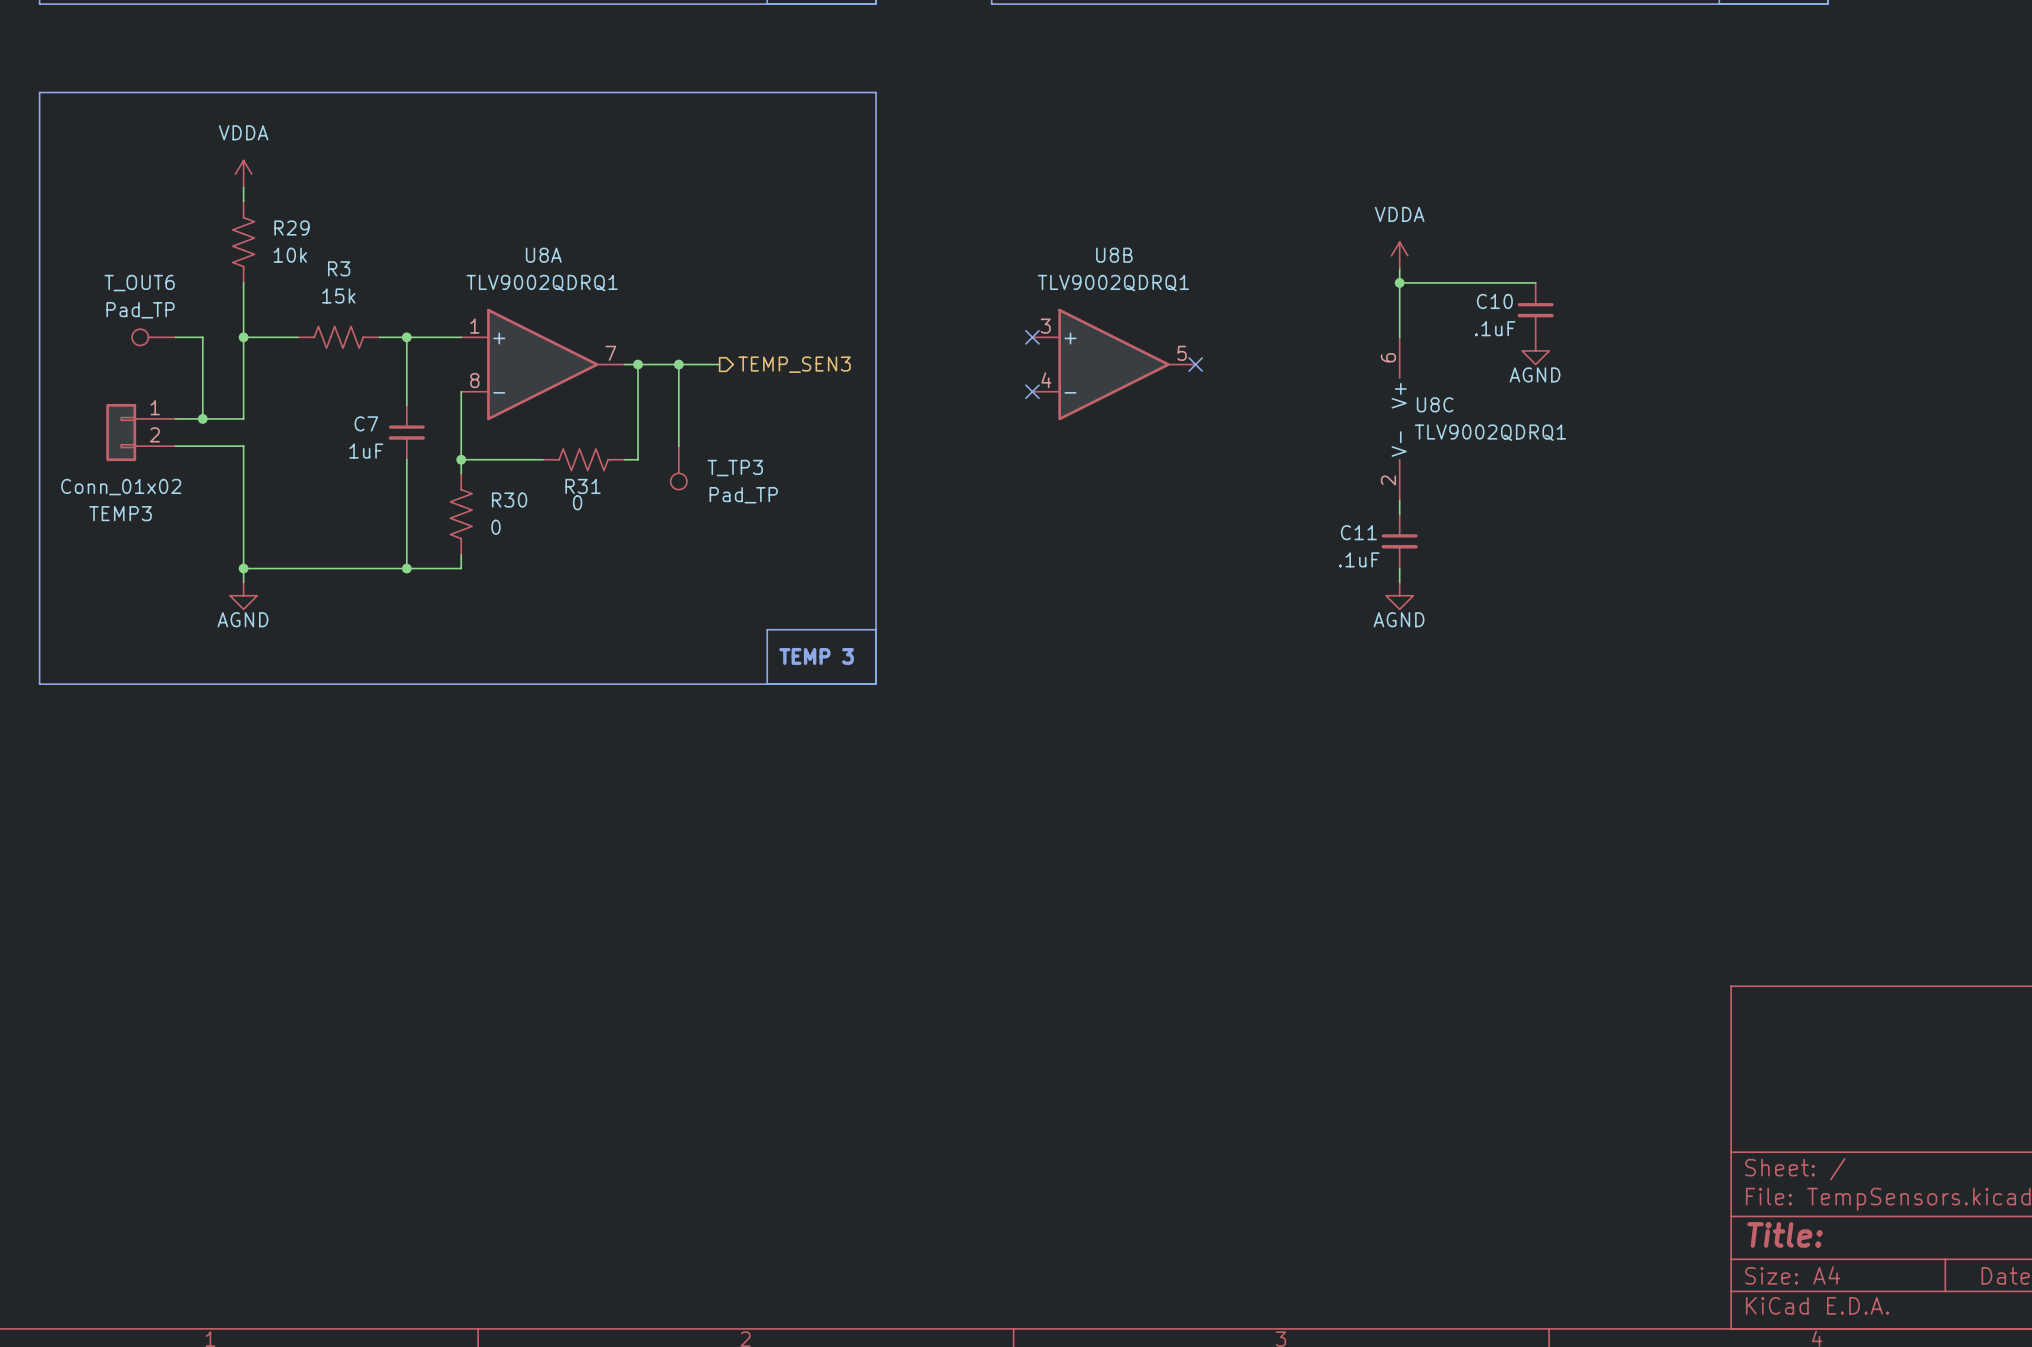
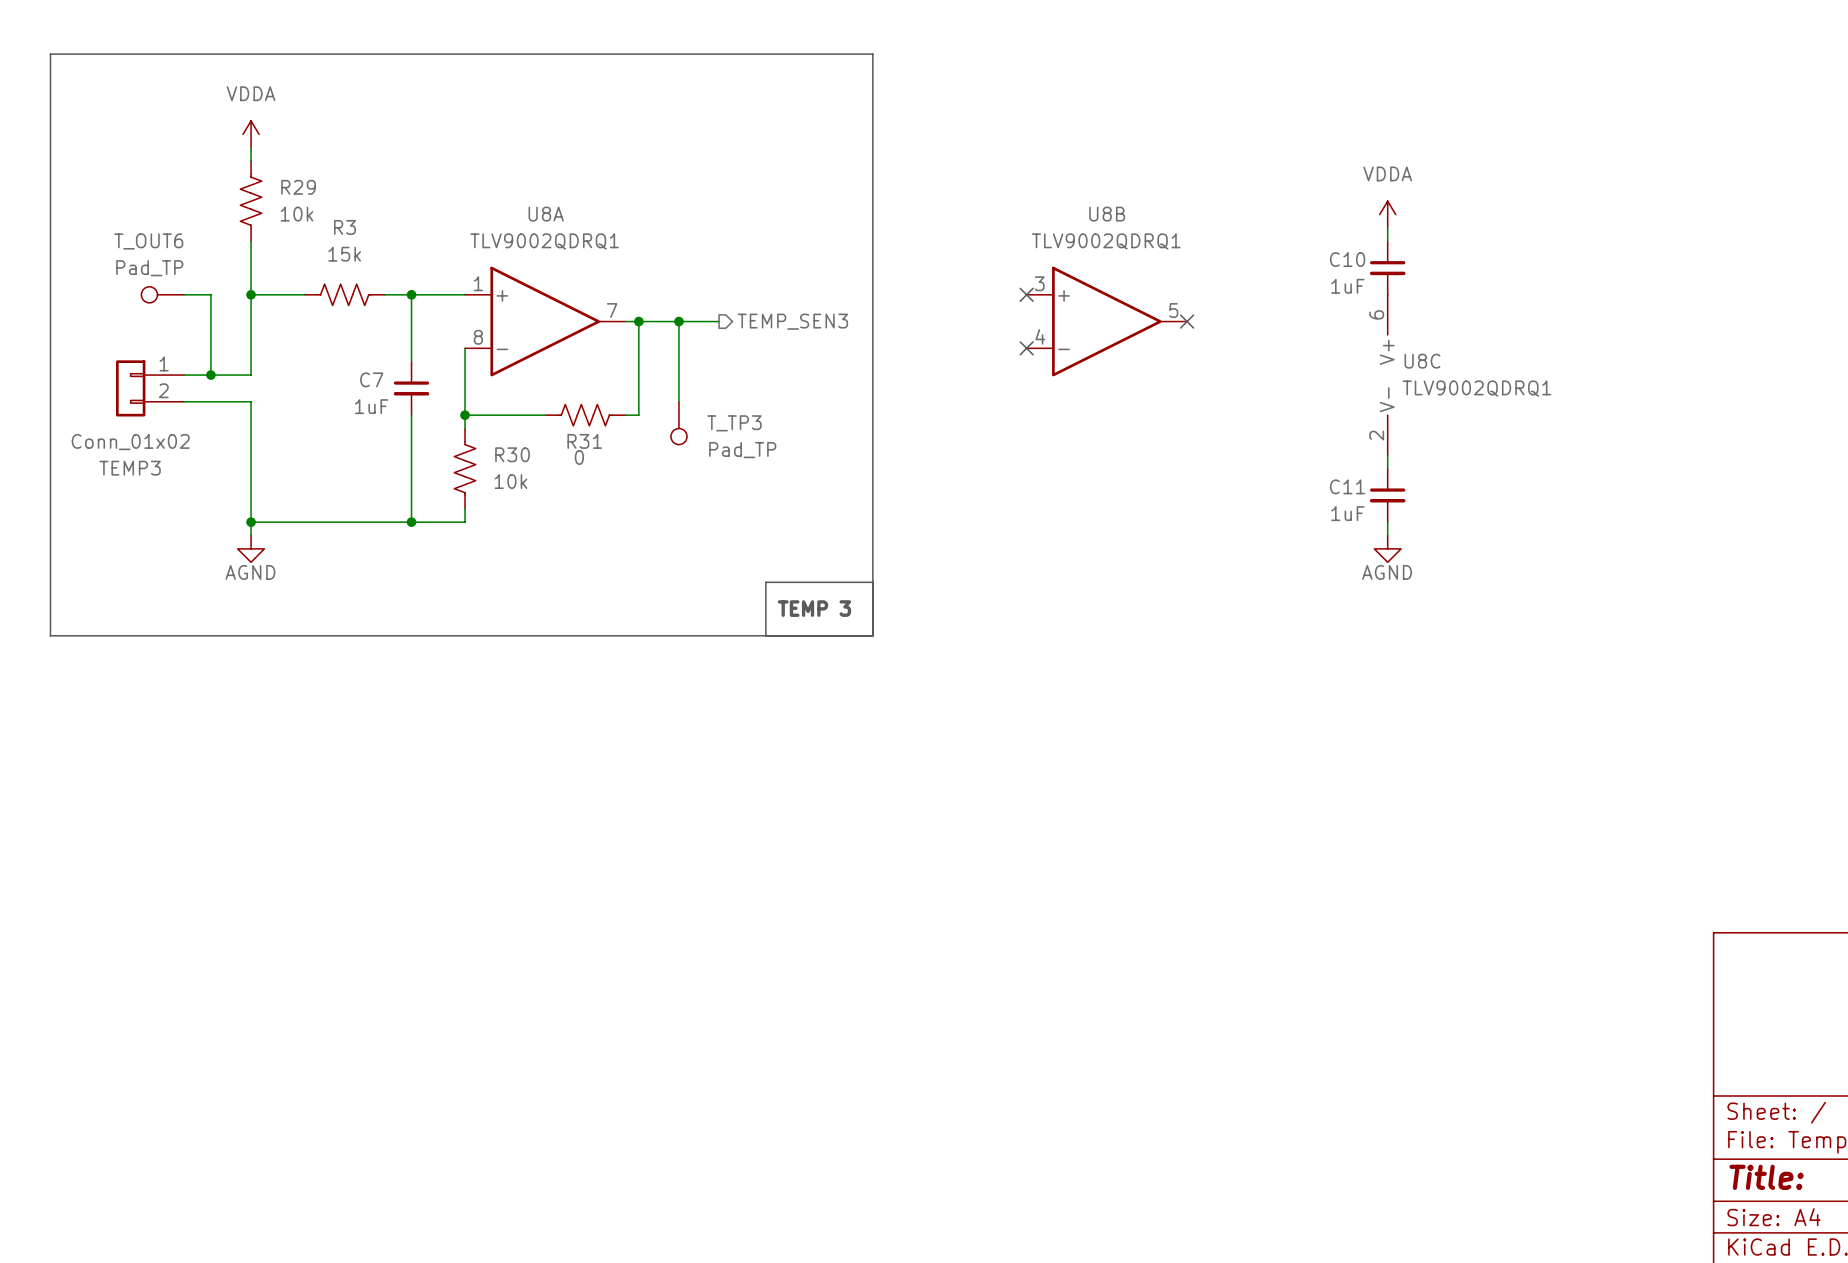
junction: (1399, 282) -> none
wire: (1535, 282) (1399, 282) (1399, 337) -> none
C10 position: (1535, 310) -> (1387, 268)
C10 value: .1uF (1495, 328) -> 1uF (1347, 286)
power symbol: AGND (1535, 350) -> none
R30 value: 0 (495, 527) -> 10k (510, 481)
C11 value: .1uF (1359, 559) -> 1uF (1347, 513)

